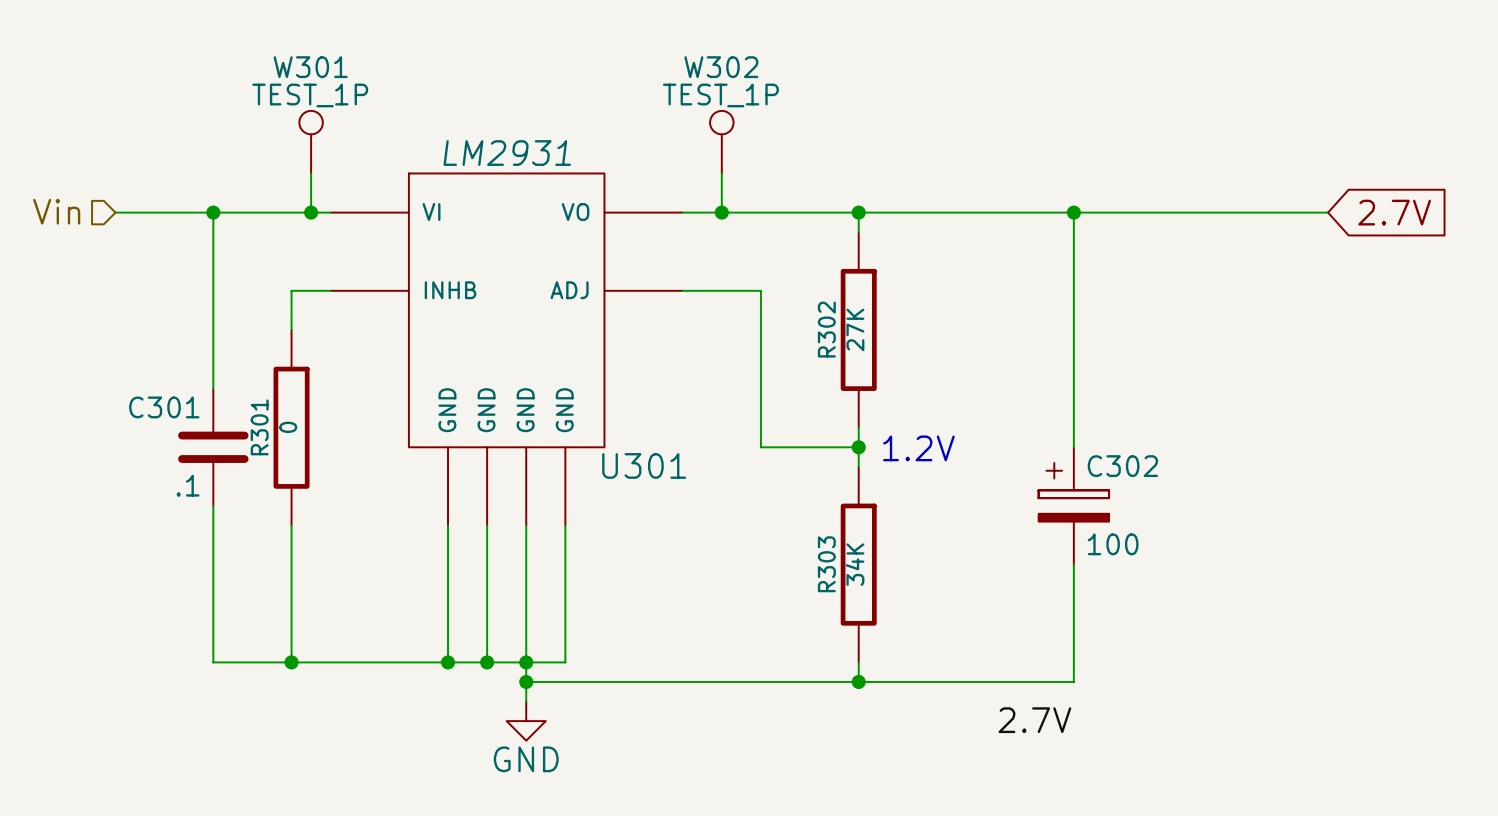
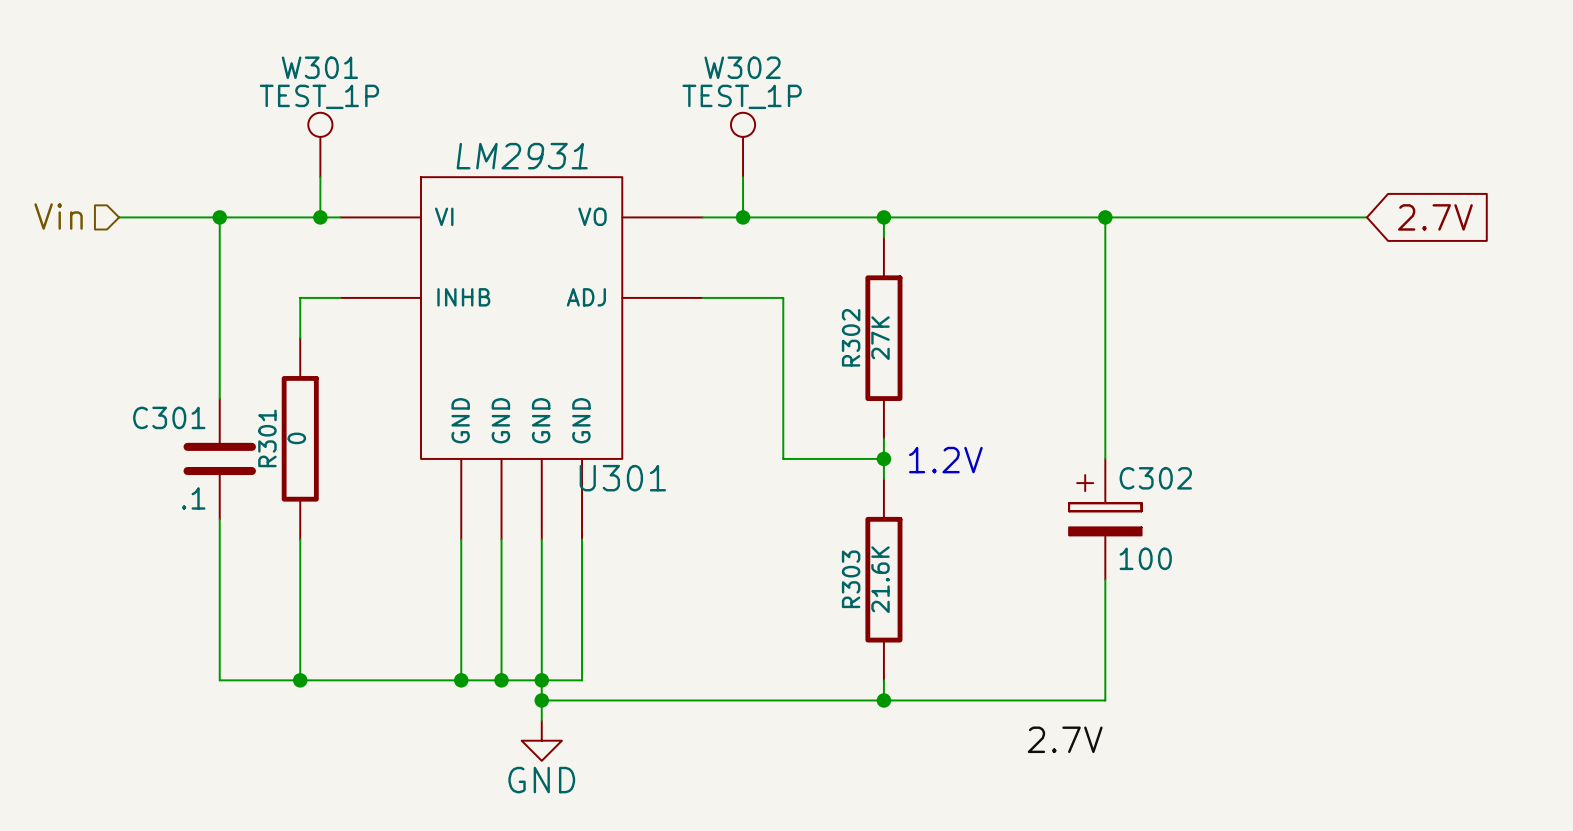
U301 name position: U301 (644, 465) -> U301 (622, 478)
R303 value: 34K (855, 564) -> 21.6K (880, 579)

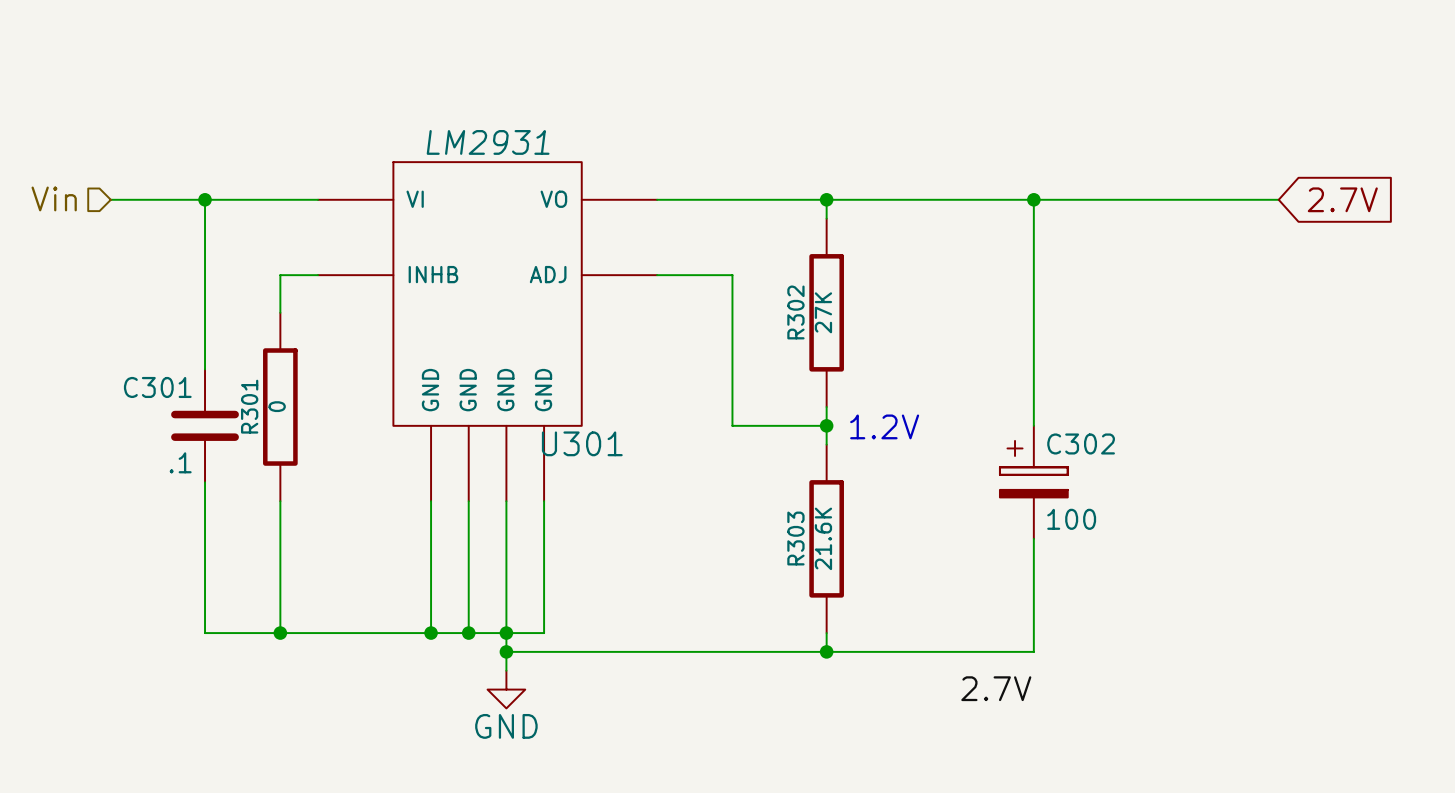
W301: TEST_1P (320, 144) -> none
W302: TEST_1P (743, 144) -> none
wire: (320, 177) (320, 217) -> none
wire: (743, 177) (743, 217) -> none
junction: (320, 217) -> none
junction: (743, 217) -> none

